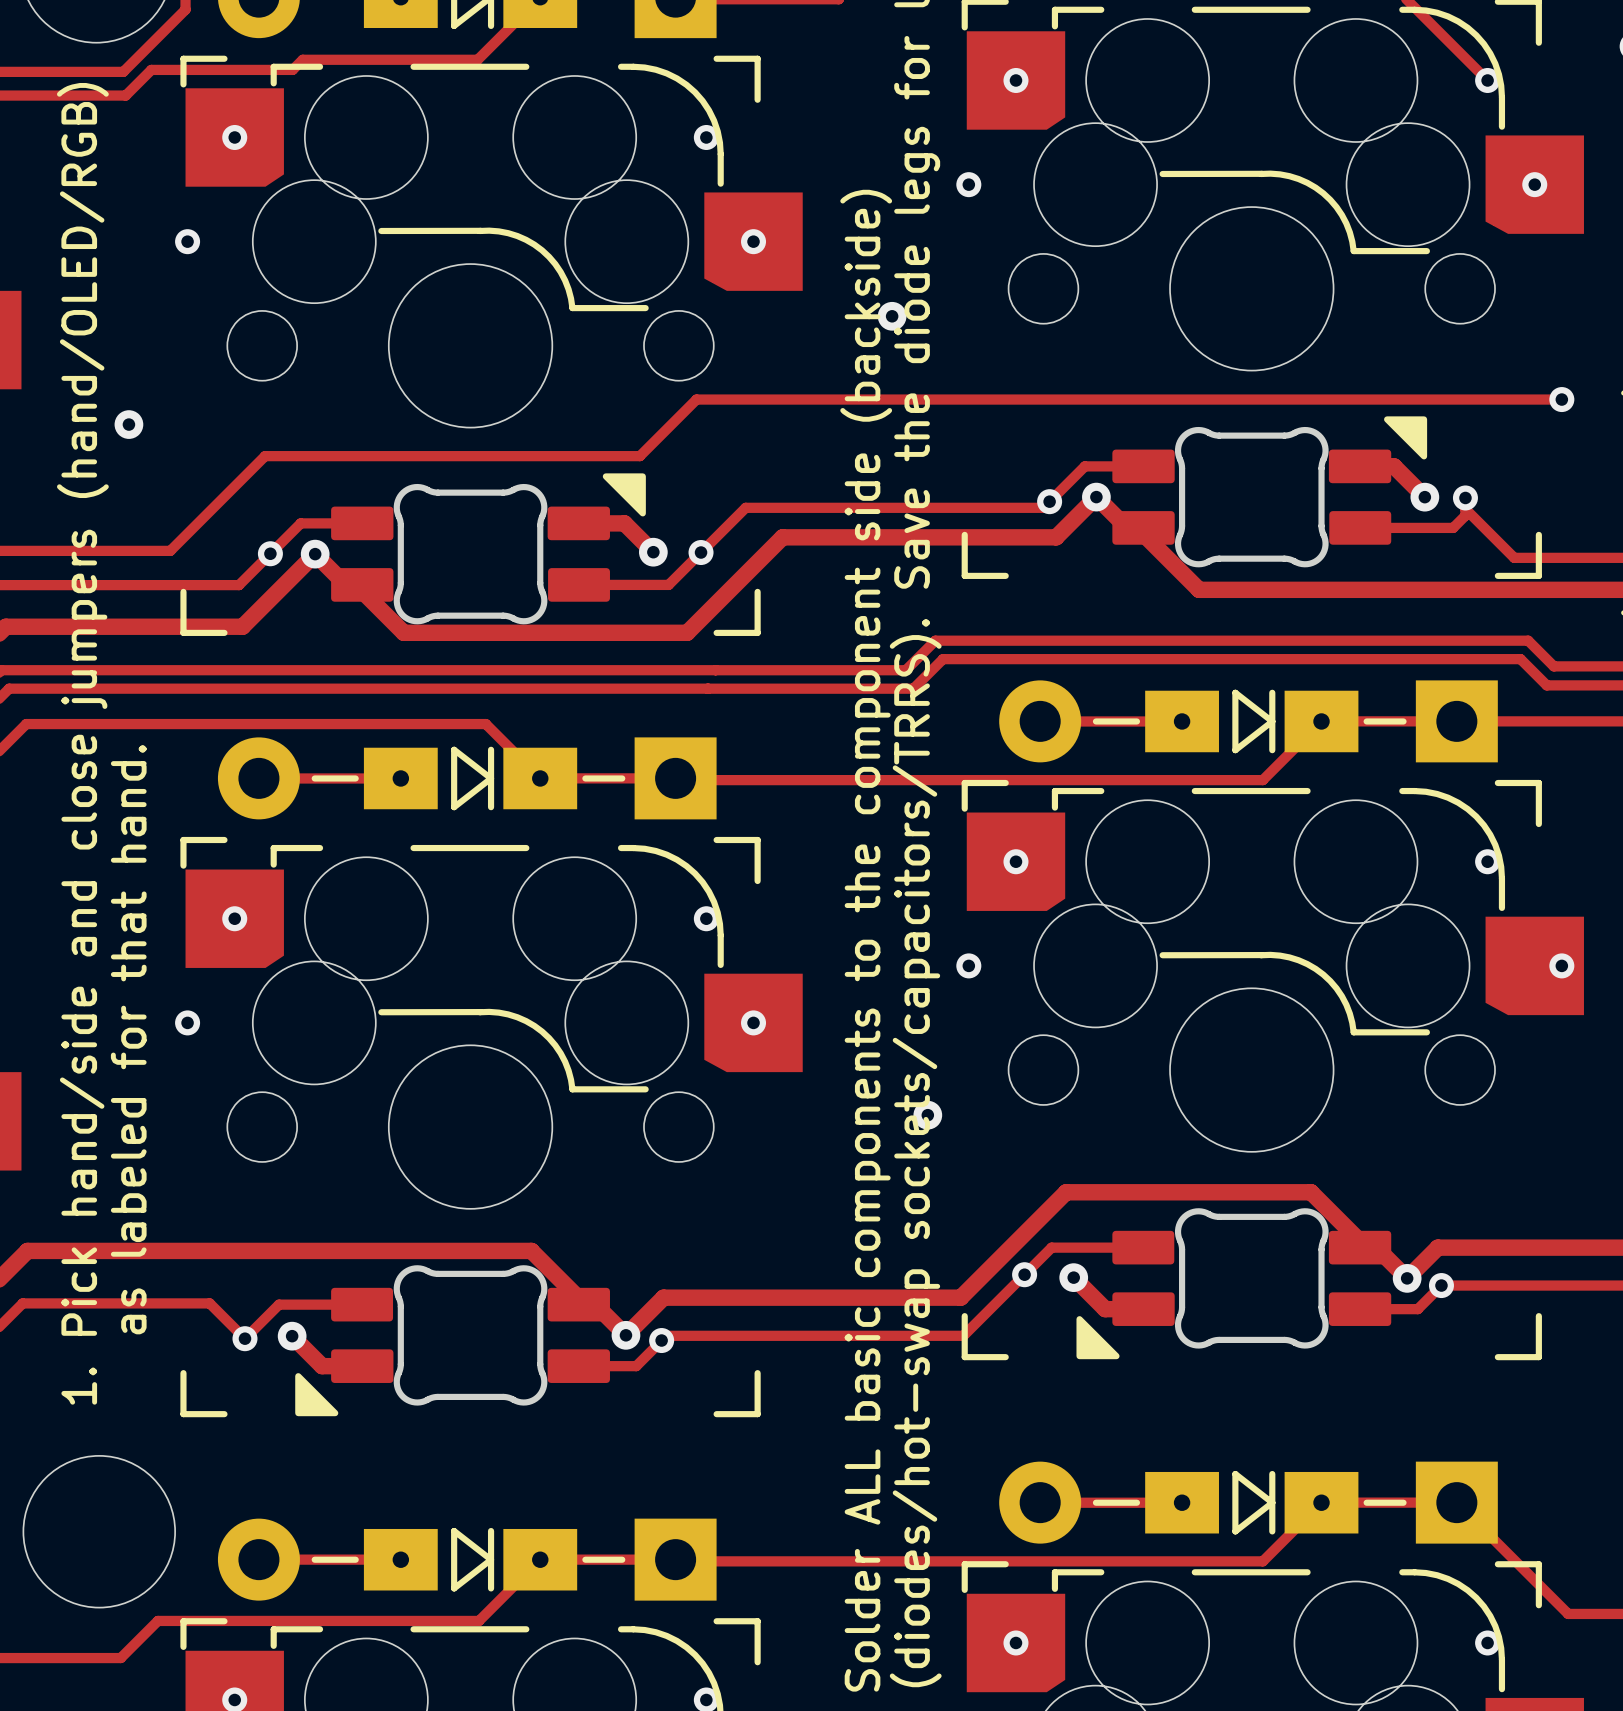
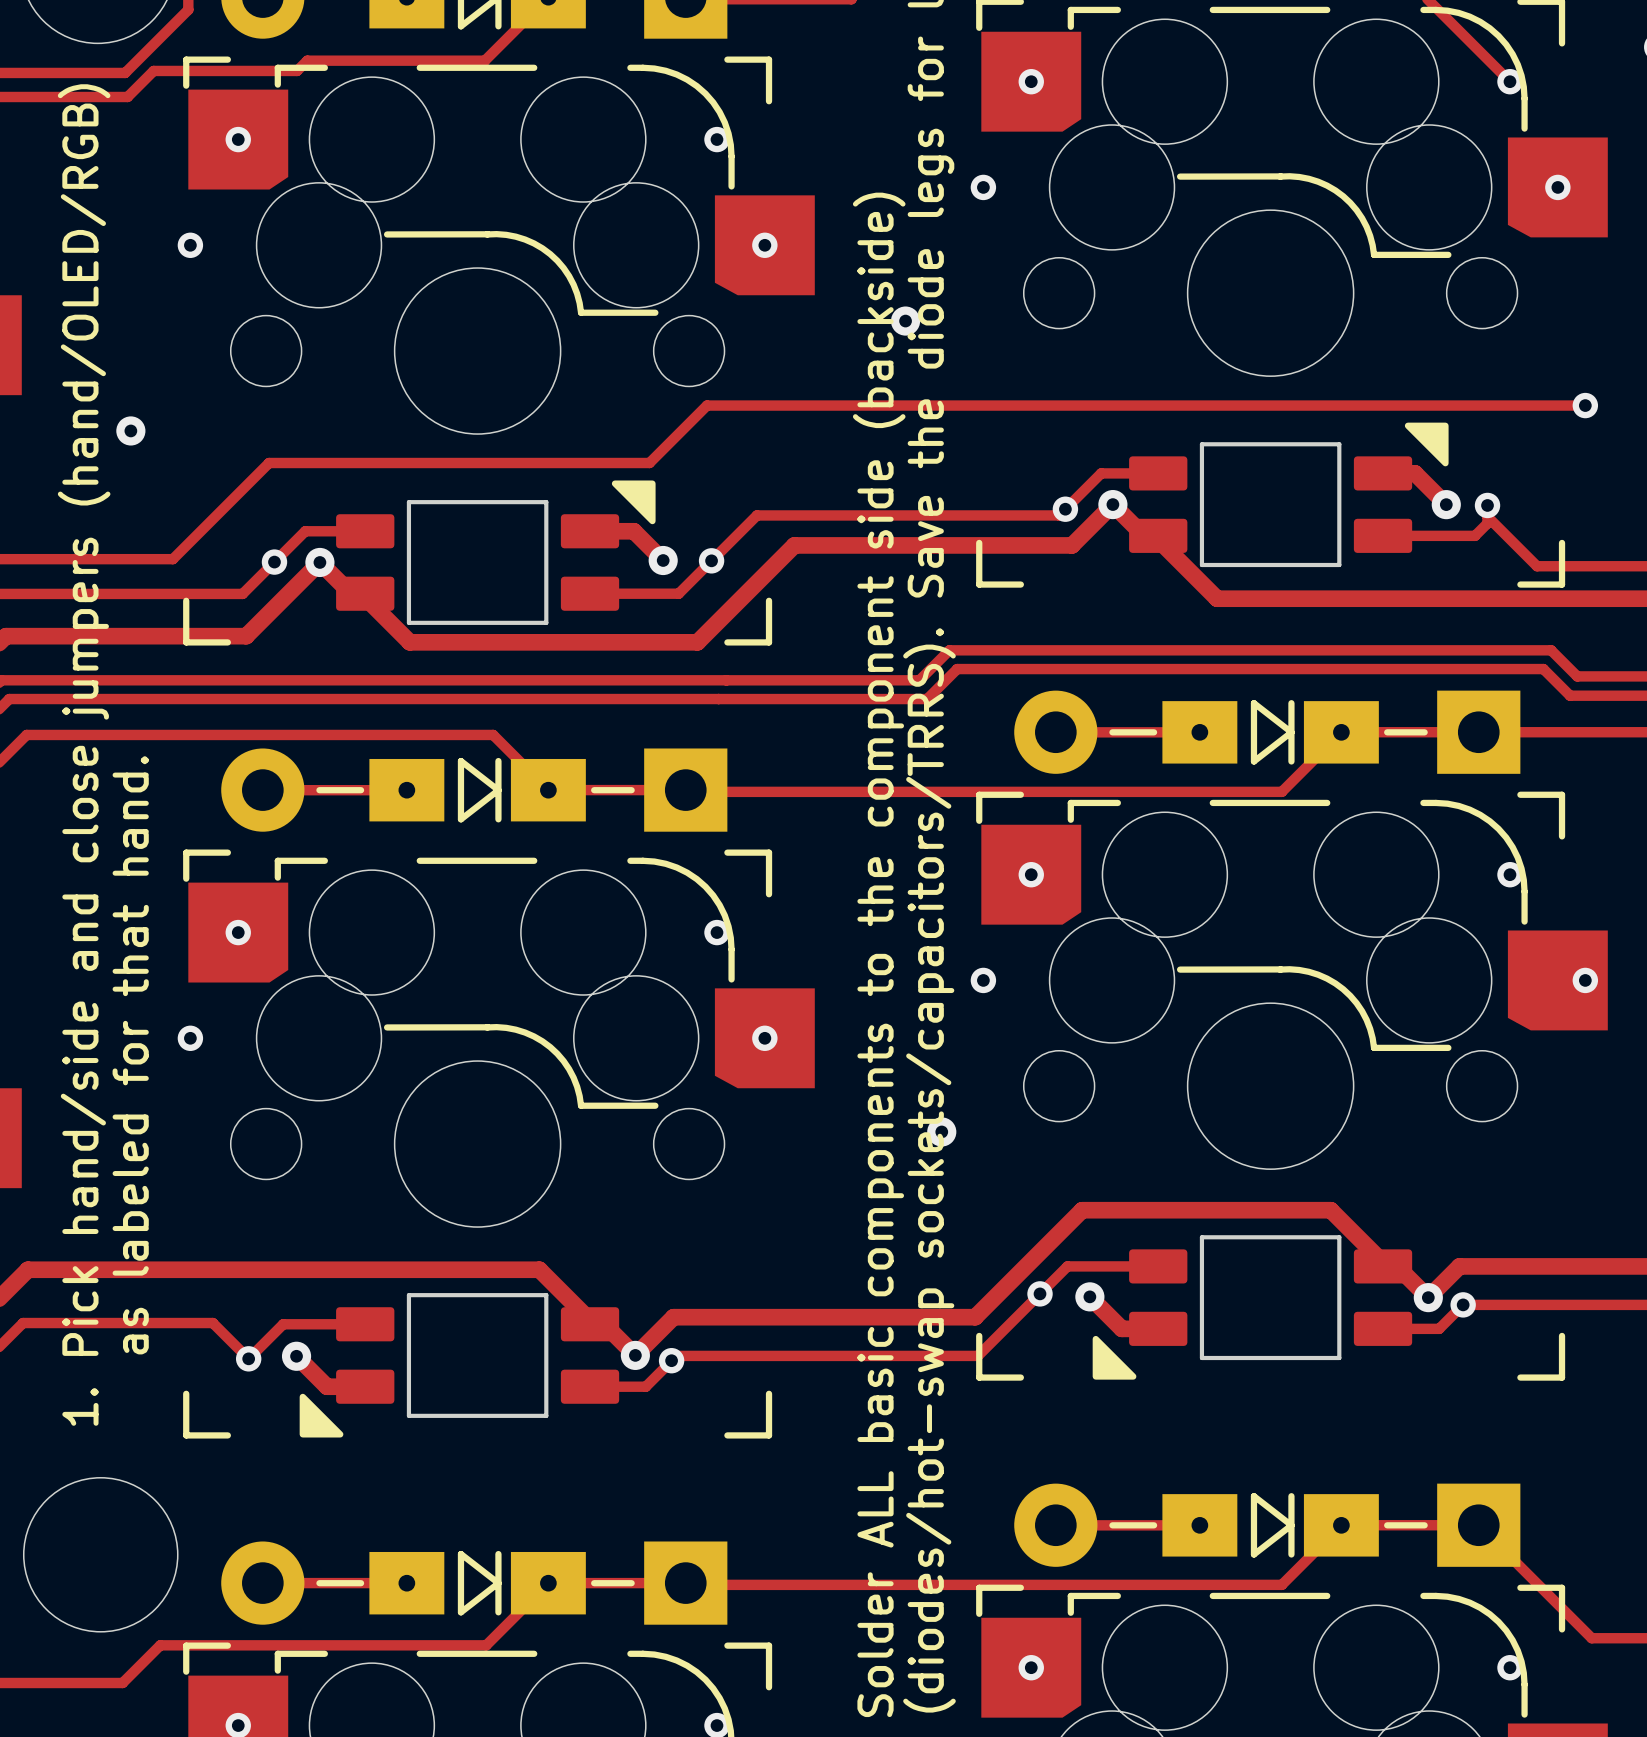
part footprint: [1112, 416, 1428, 568] -> [1129, 422, 1449, 568]
part footprint: [331, 473, 646, 625] -> [336, 480, 656, 625]
part footprint: [1076, 1208, 1392, 1360] -> [1092, 1235, 1413, 1380]
part footprint: [295, 1265, 610, 1417] -> [299, 1293, 620, 1438]

